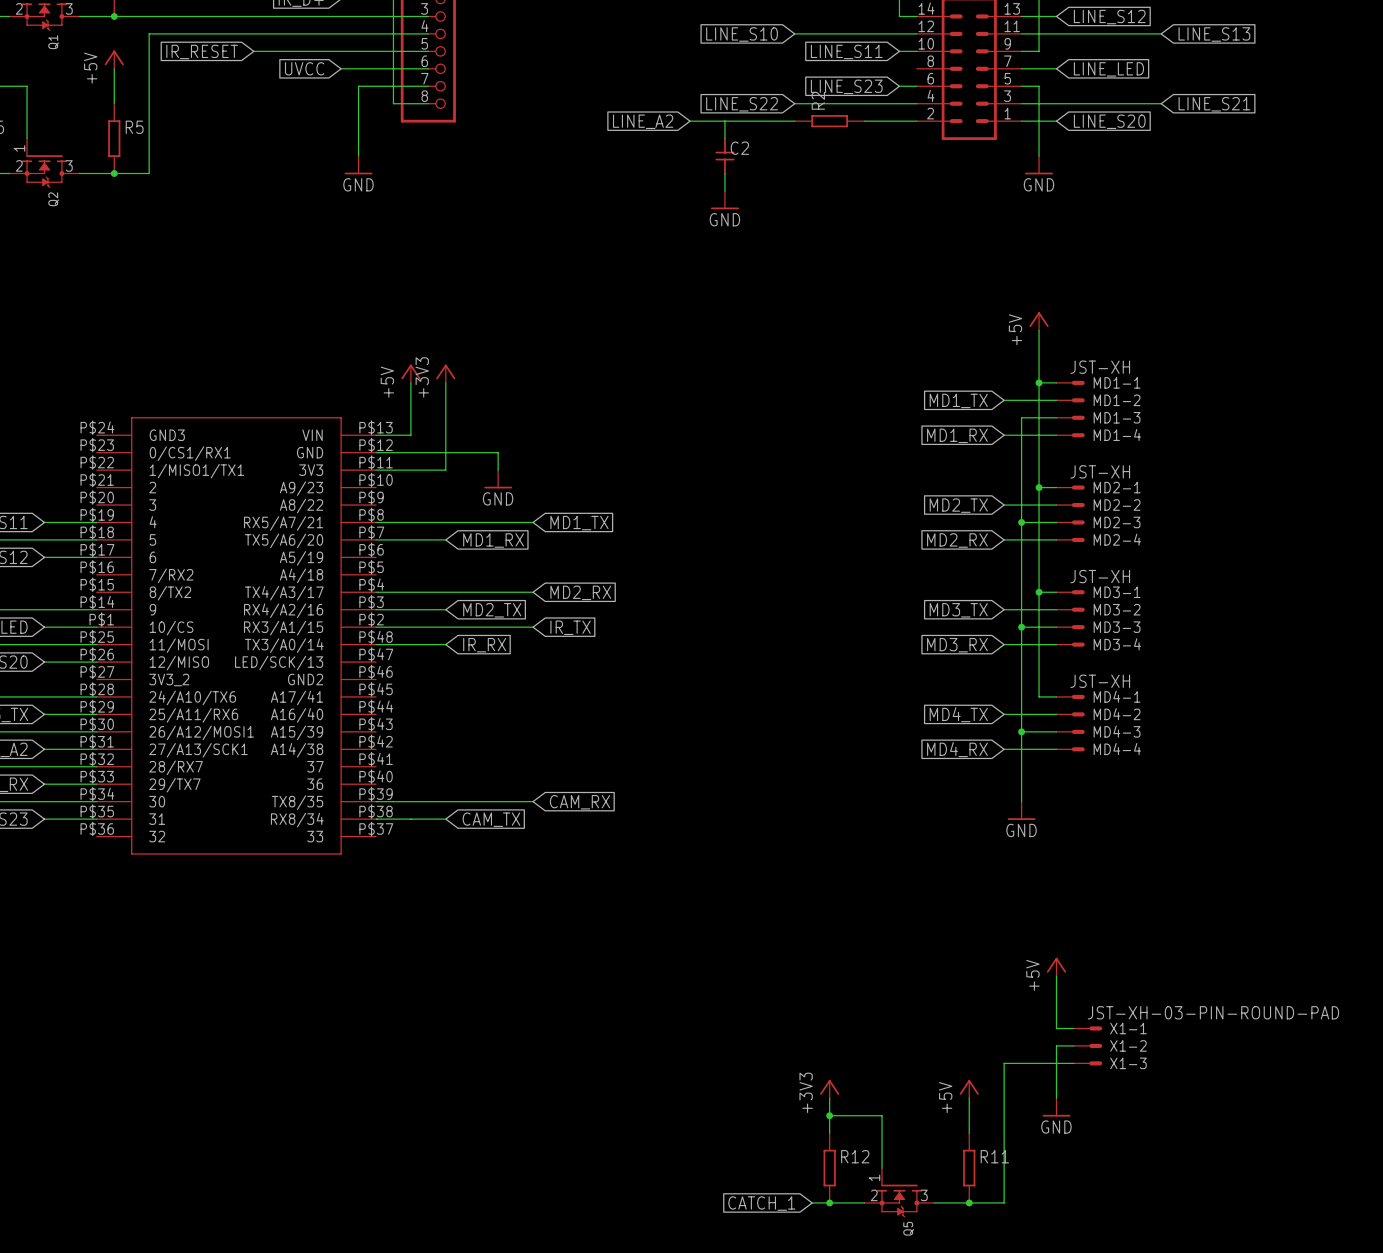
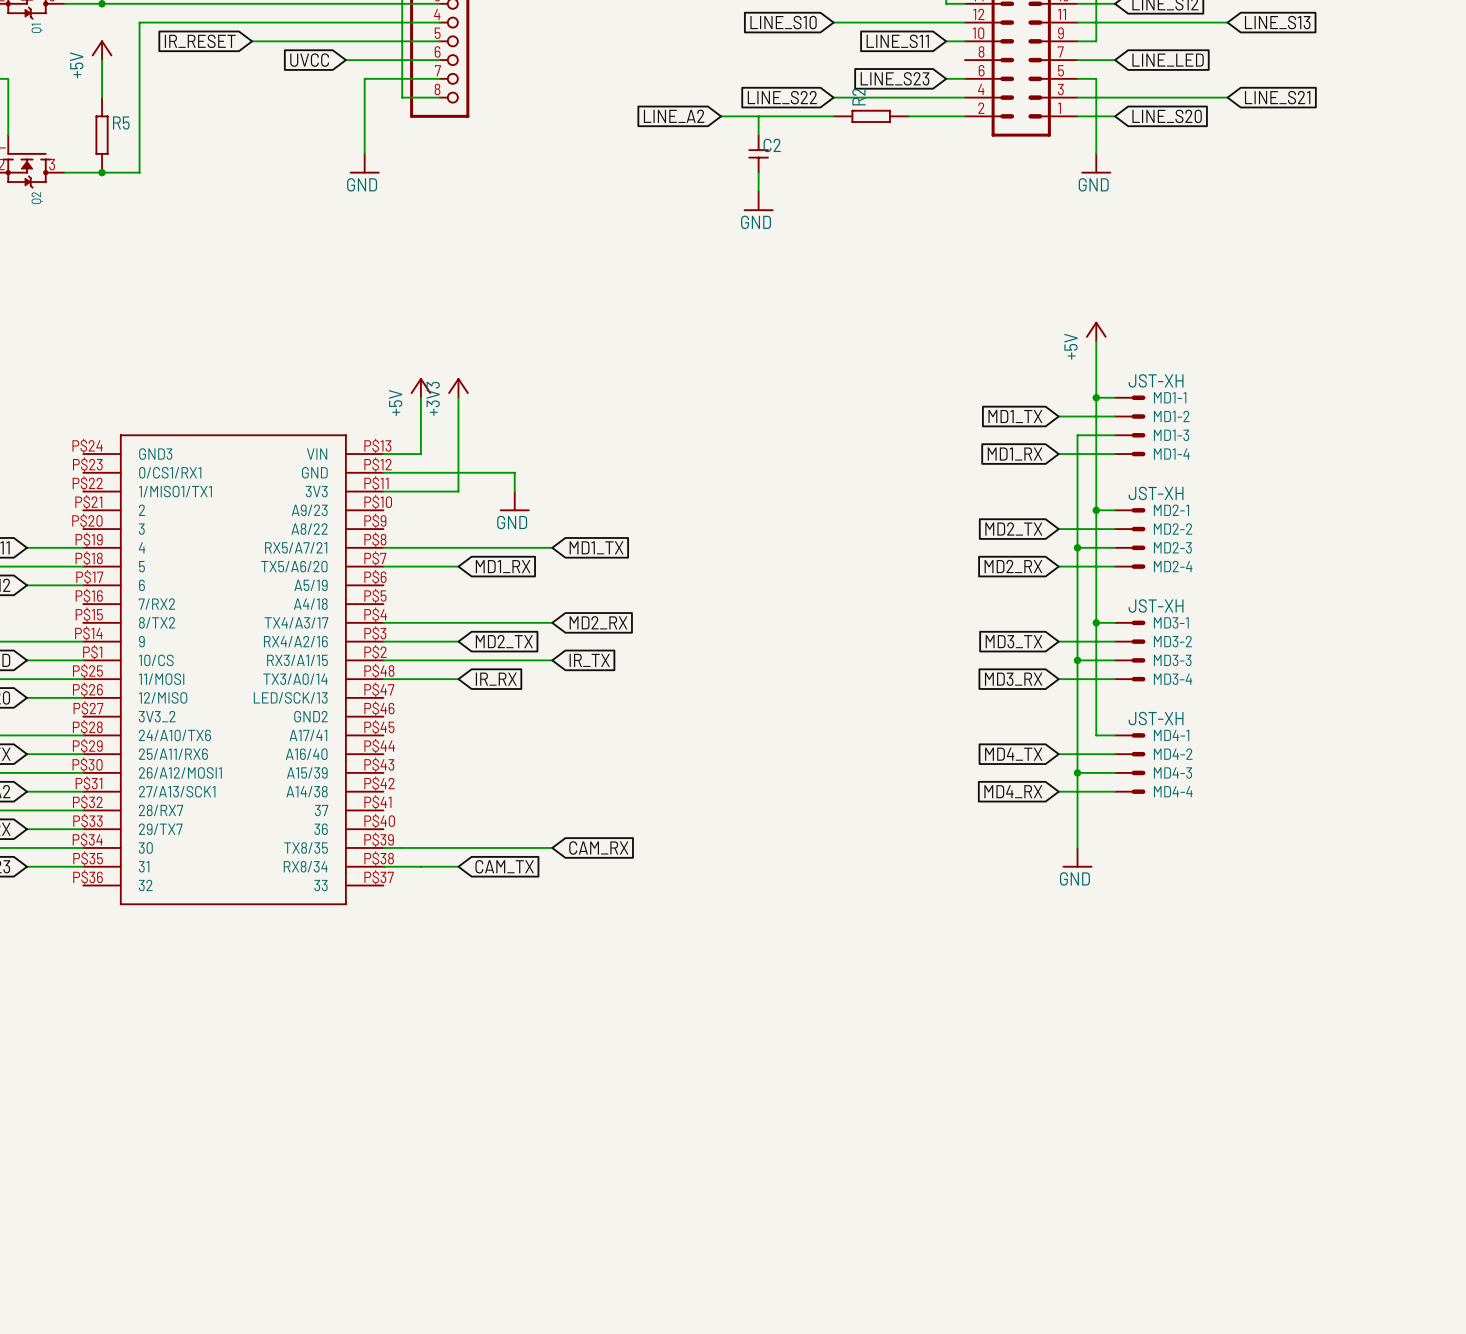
power symbol: +5V (1056, 966) -> none
wire: (1056, 976) (1056, 1028) (1073, 1028) -> none
X1-1: JST-XH-03-PIN-ROUND-PAD (1088, 1028) -> none
wire: (1073, 1045) (1056, 1045) (1056, 1098) -> none
X1-2: (1088, 1045) -> none
wire: (1073, 1063) (1004, 1063) (1004, 1202) (934, 1202) -> none
X1-3: (1088, 1063) -> none
power symbol: +3V3 (829, 1089) -> none
power symbol: +5V (969, 1089) -> none
wire: (829, 1098) (829, 1133) -> none
wire: (969, 1098) (969, 1133) -> none
power symbol: GND (1056, 1107) -> none
wire: (829, 1115) (882, 1115) (882, 1168) -> none
junction: (829, 1115) -> none
R12: (829, 1168) -> none
R11: (969, 1168) -> none
Q5: (899, 1192) -> none
wire: (812, 1202) (864, 1202) -> none
junction: (829, 1202) -> none
junction: (969, 1202) -> none
global label: CATCH_1 (761, 1203) -> none

